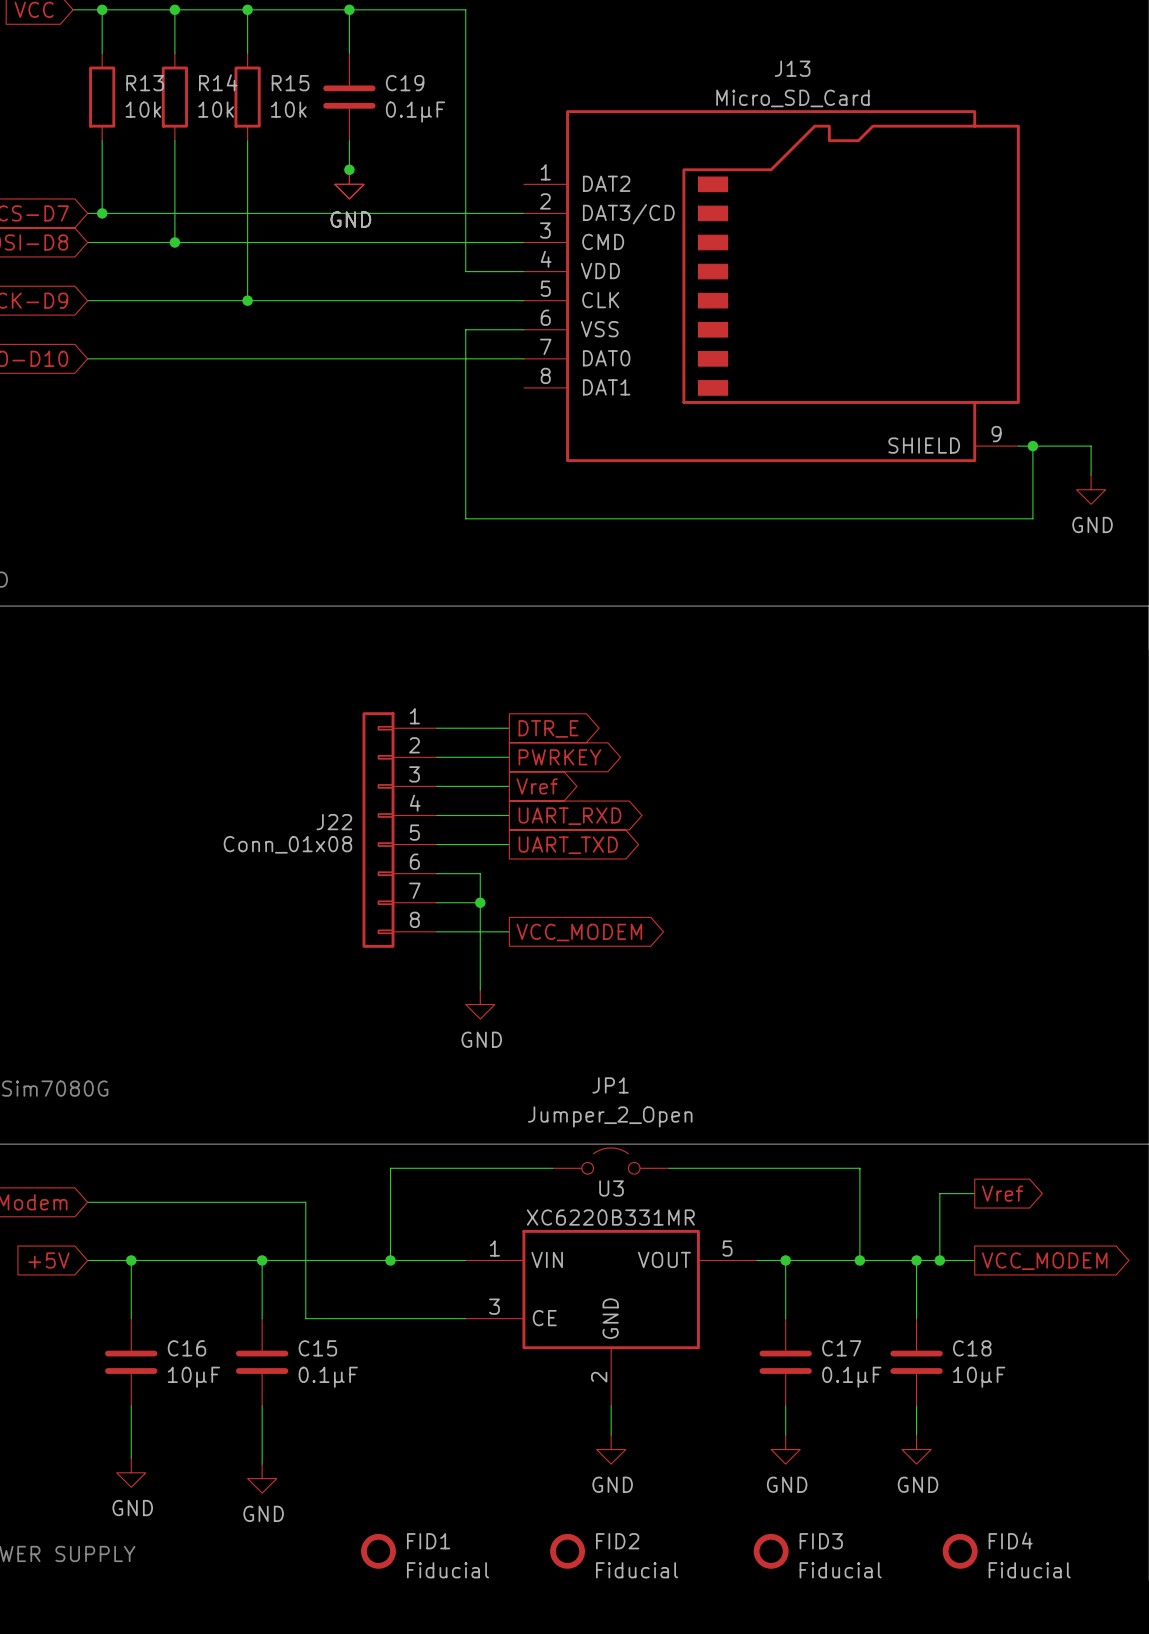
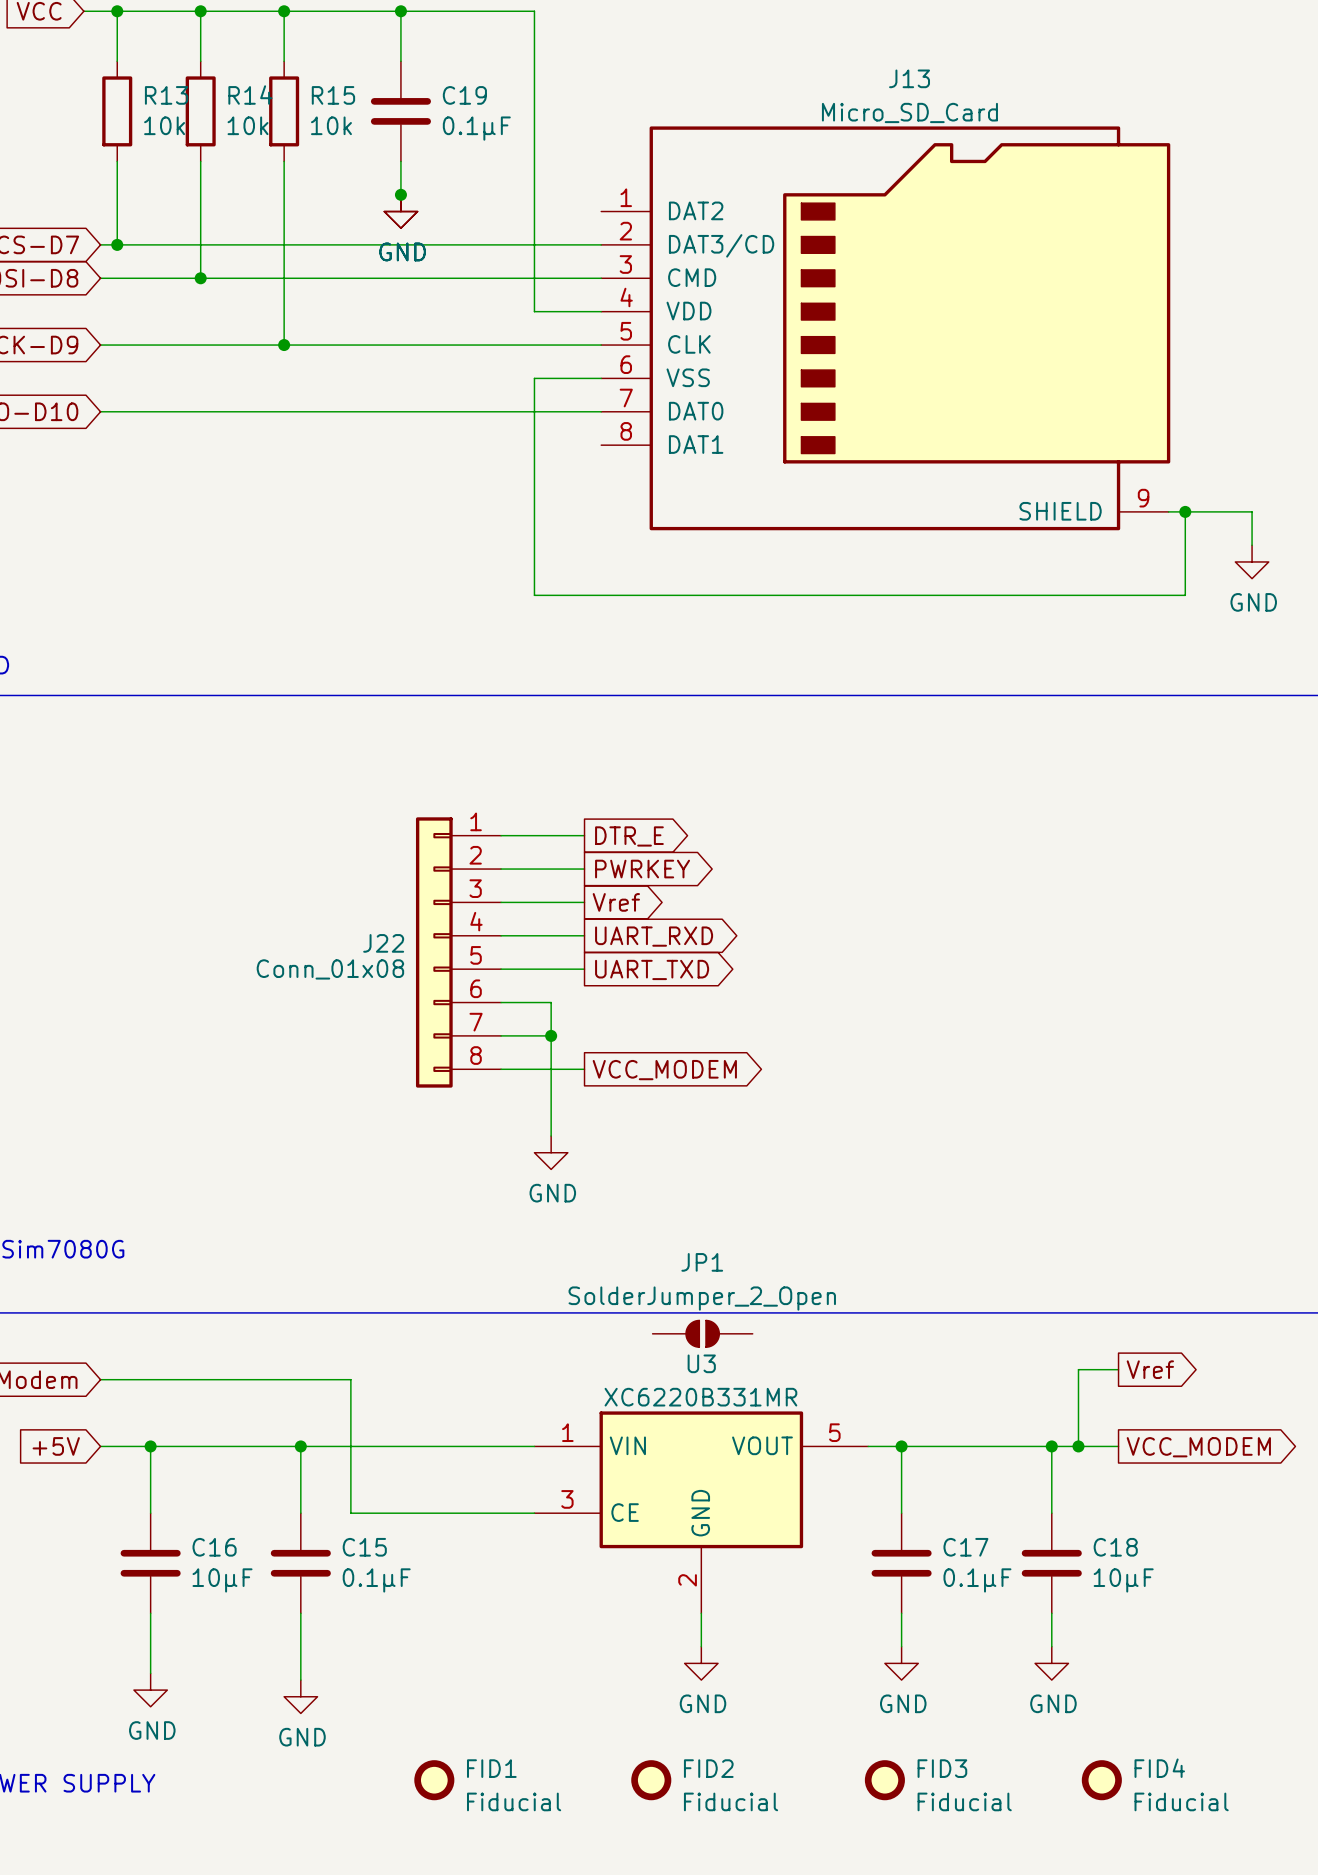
JP1 value: Jumper_2_Open (610, 1116) -> SolderJumper_2_Open (702, 1298)
JP1 symbol: [552, 1147, 670, 1175] -> [652, 1320, 753, 1348]
wire: (552, 1168) (390, 1168) (390, 1260) -> none
wire: (669, 1168) (859, 1168) -> none
wire: (859, 1168) (859, 1260) -> none
junction: (390, 1260) -> none
junction: (859, 1260) -> none

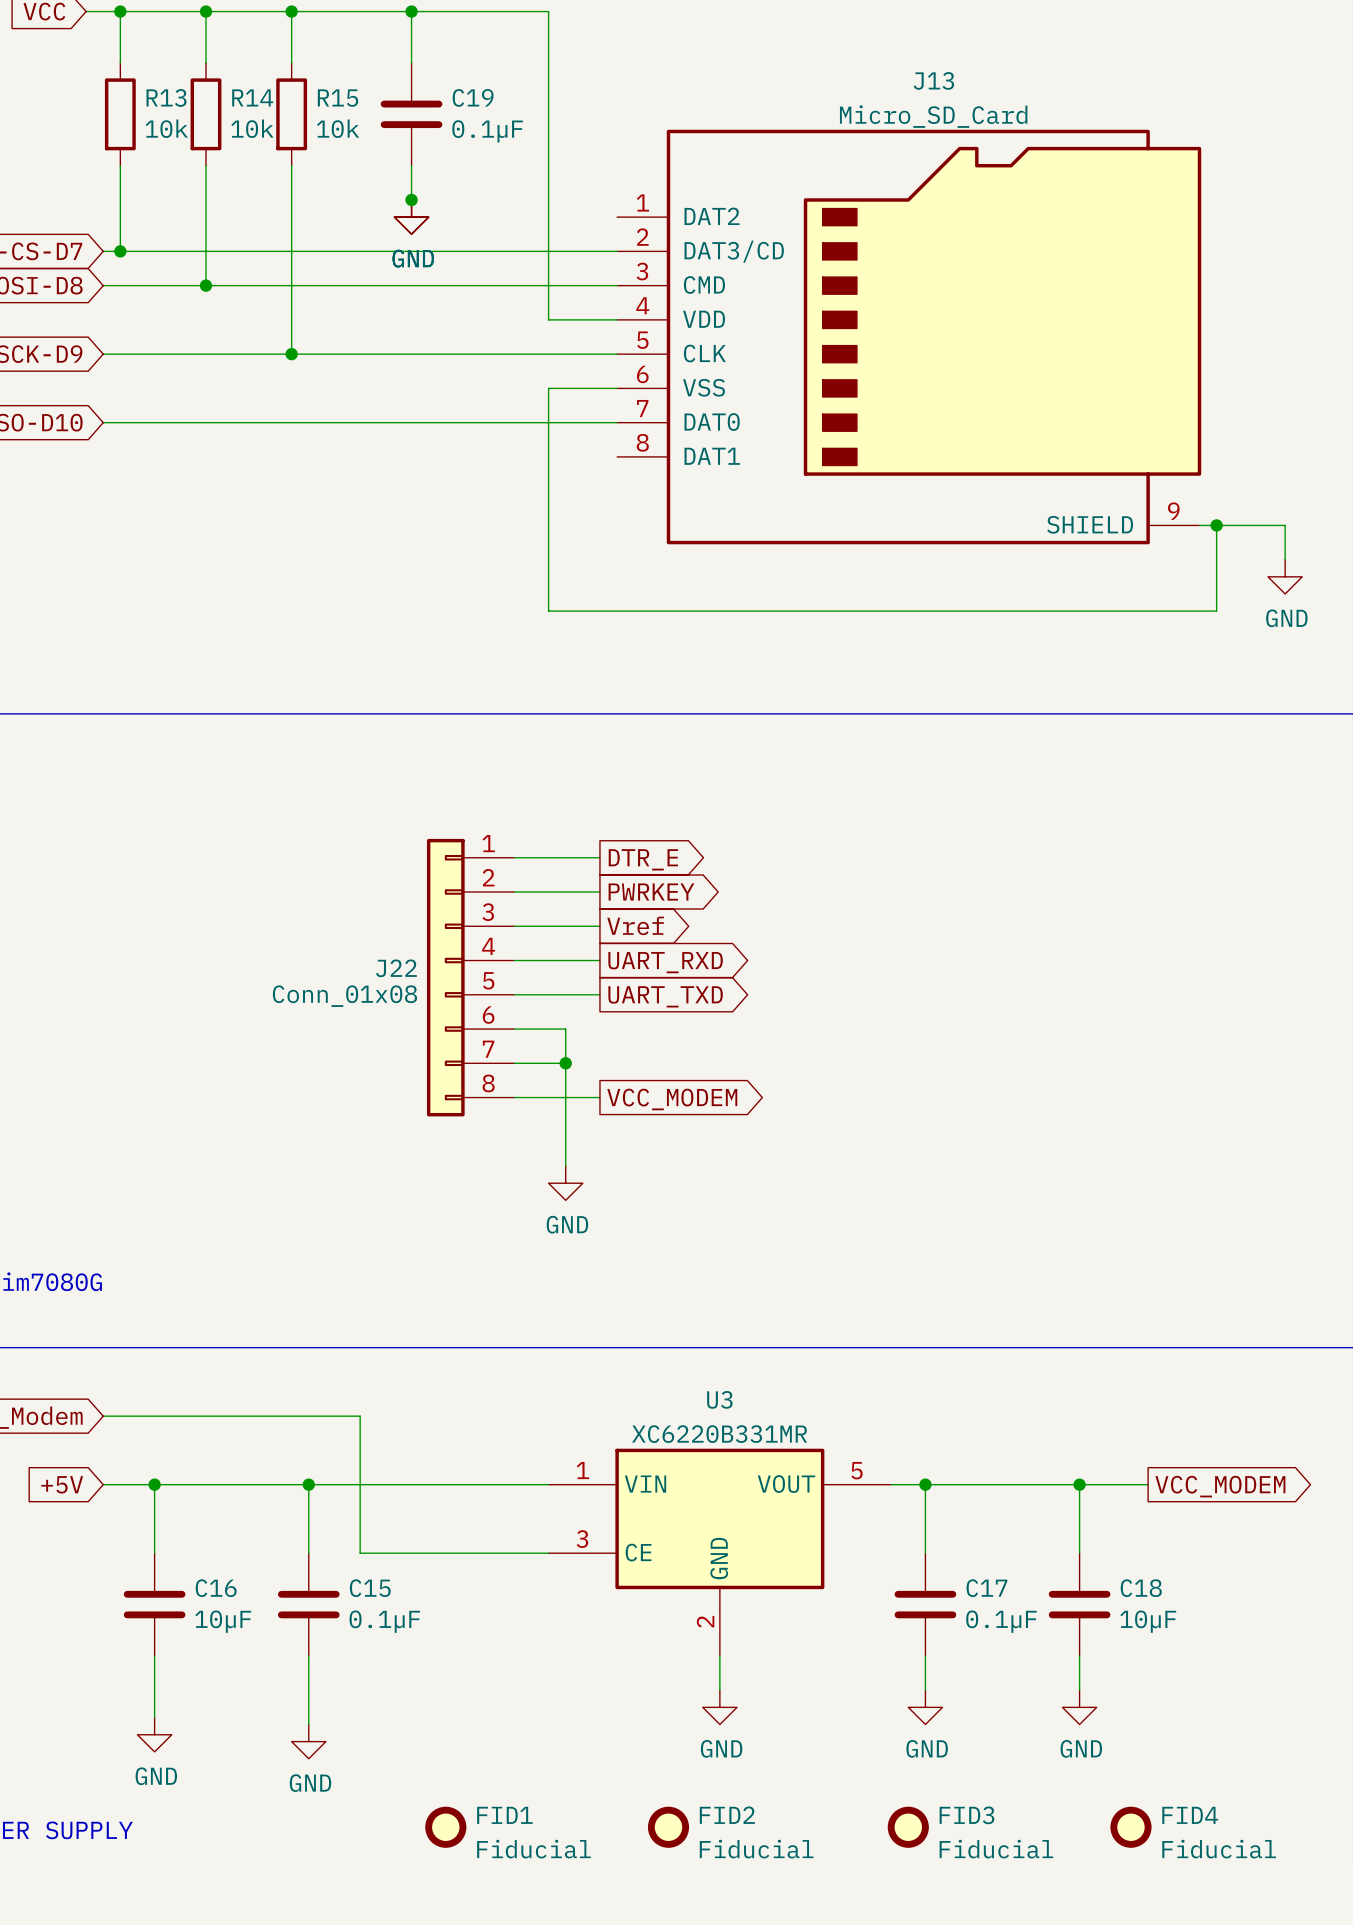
JP1: SolderJumper_2_Open (702, 1333) -> none
wire: (1118, 1369) (1078, 1369) (1078, 1446) -> none
global label: Vref (1150, 1369) -> none
junction: (1078, 1446) -> none

